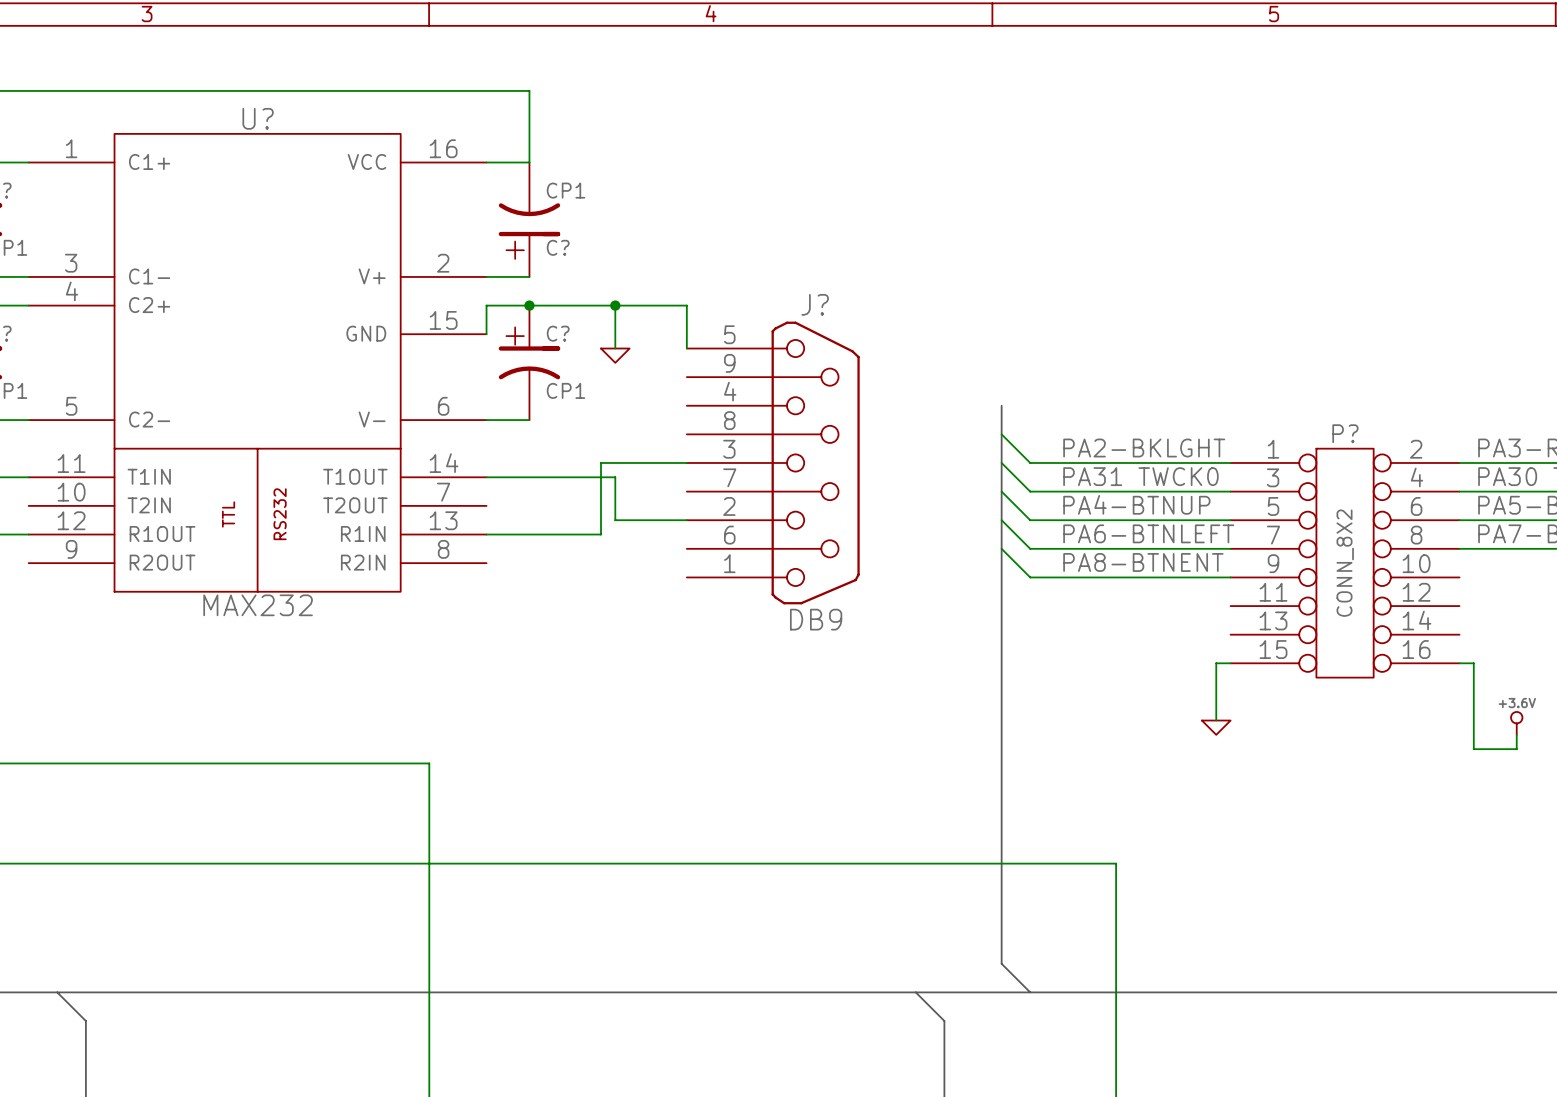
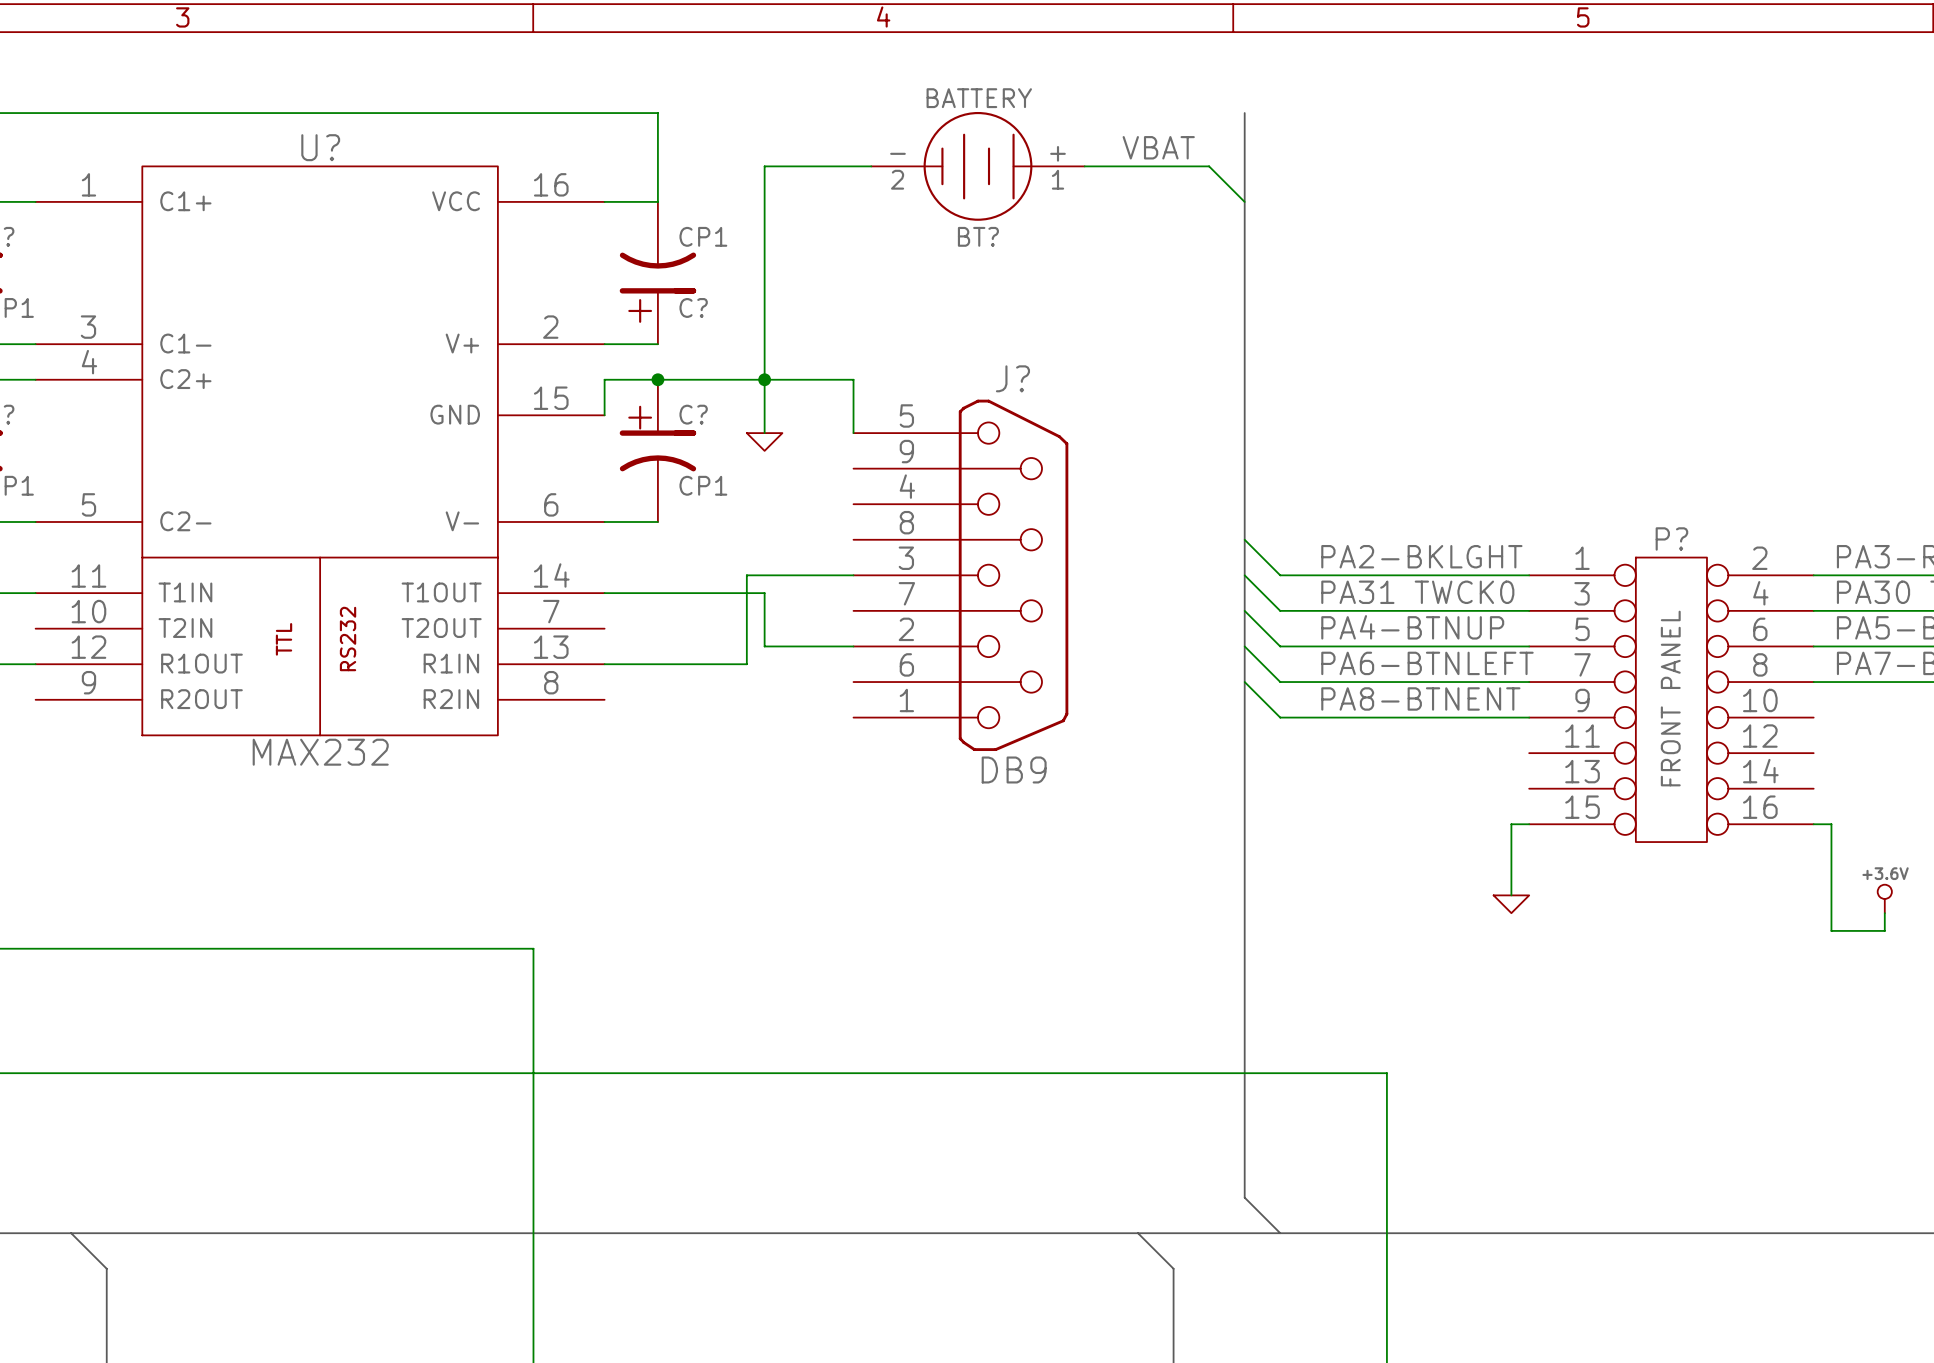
bus: none -> (1244, 113) (1244, 504)
label: none -> VBAT (1158, 147)
wire: none -> (871, 166) (764, 166) (764, 379)
BT?: none -> BATTERY (977, 166)
wire: none -> (1084, 166) (1209, 166) (1244, 201)
P? value: CONN_8X2 (1345, 563) -> FRONT PANEL (1670, 698)

